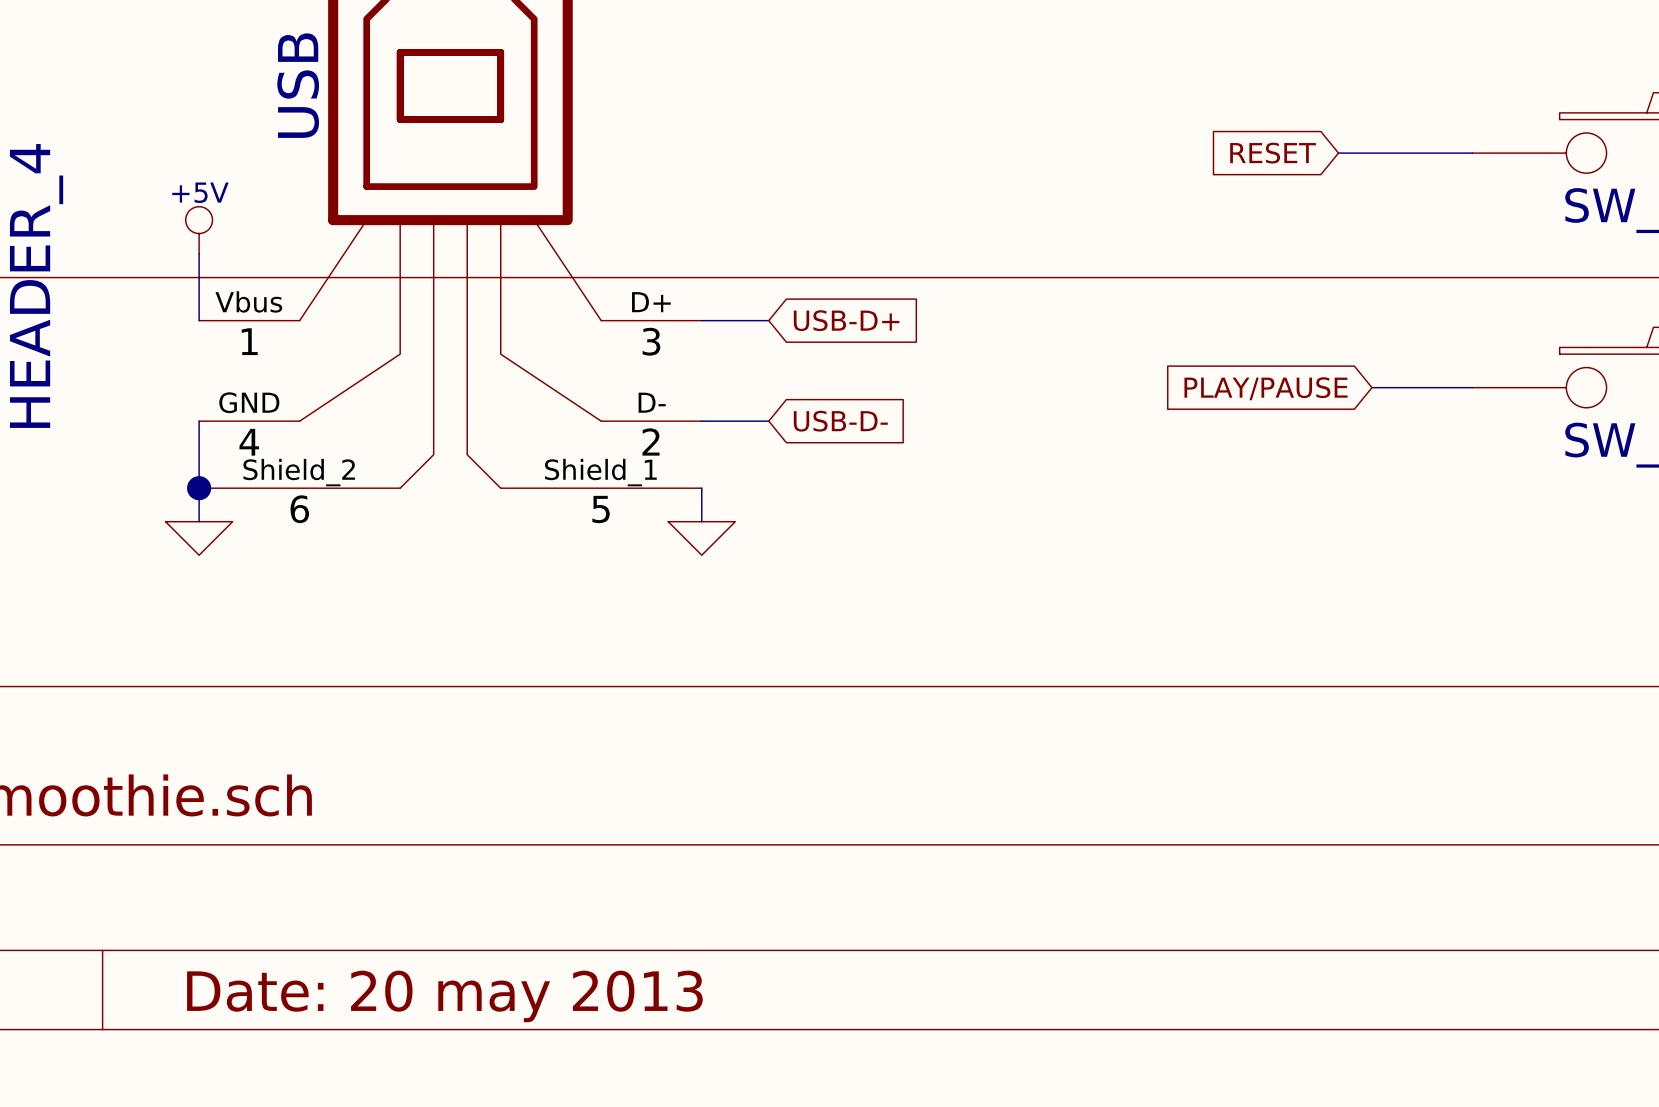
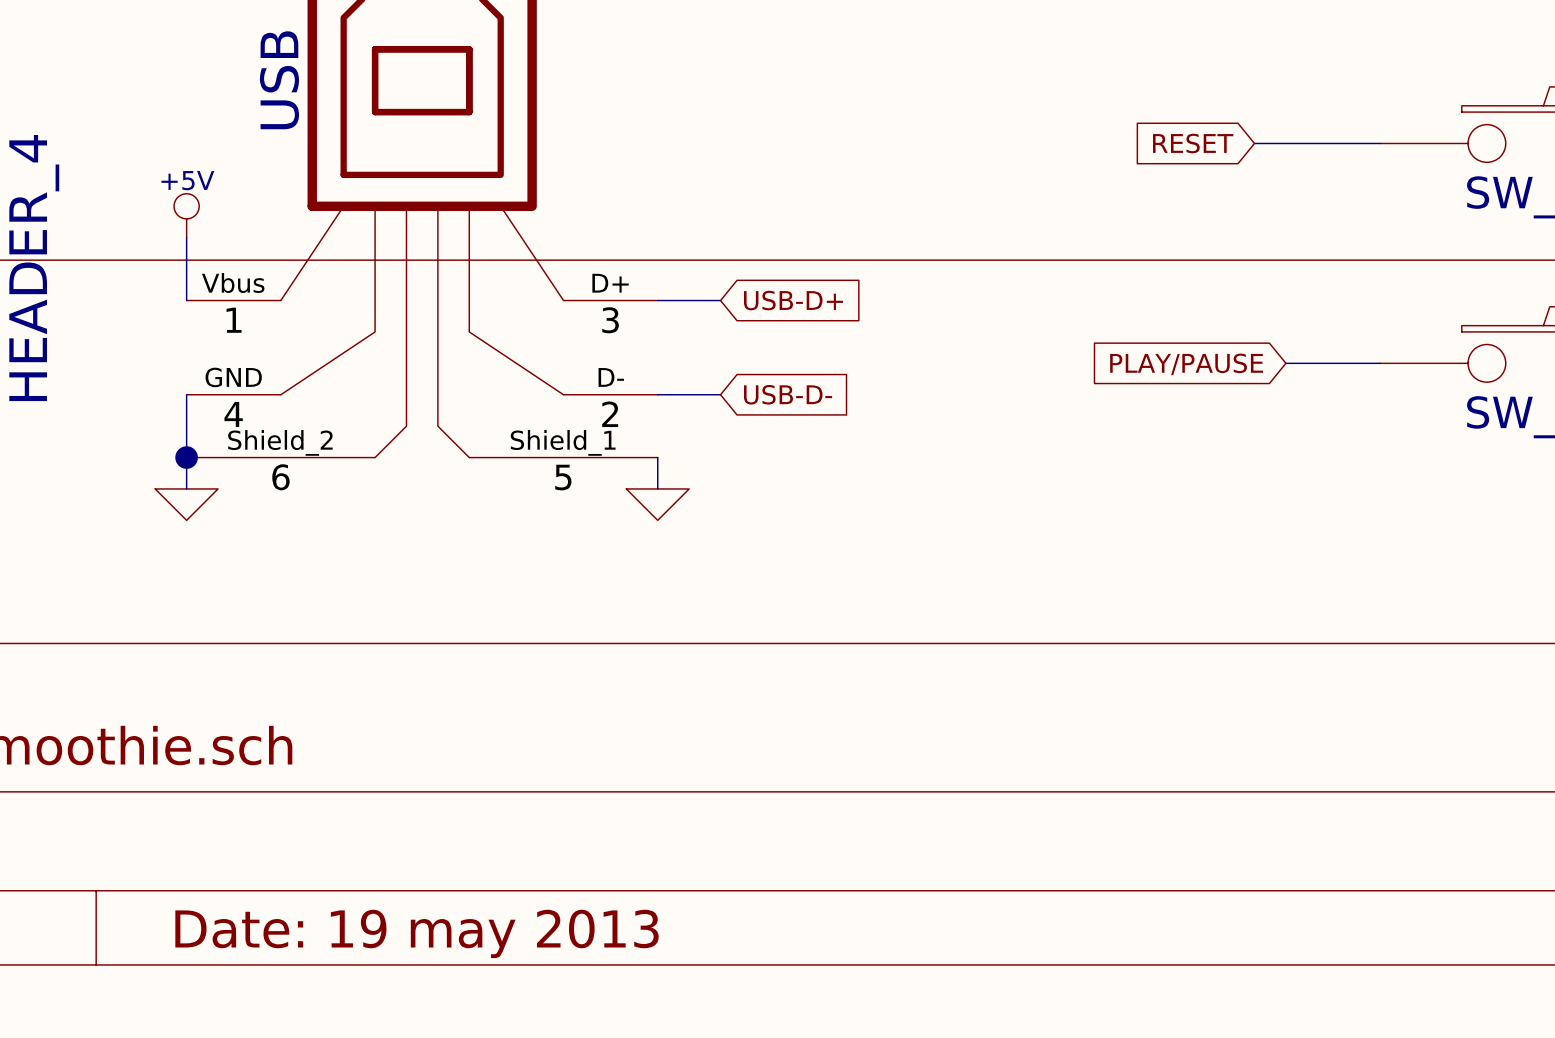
title block: Date: 20 may 2013 (444, 996) -> Date: 19 may 2013 (417, 933)

